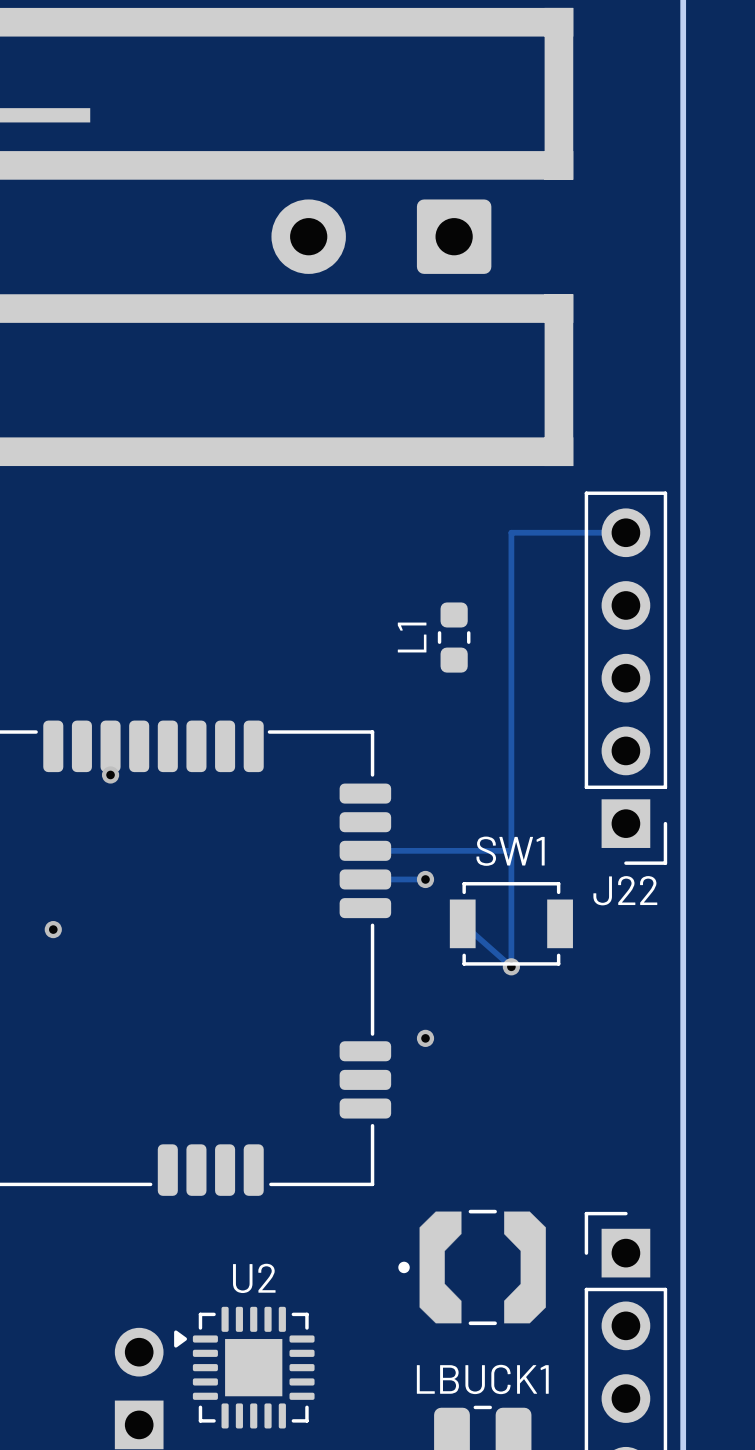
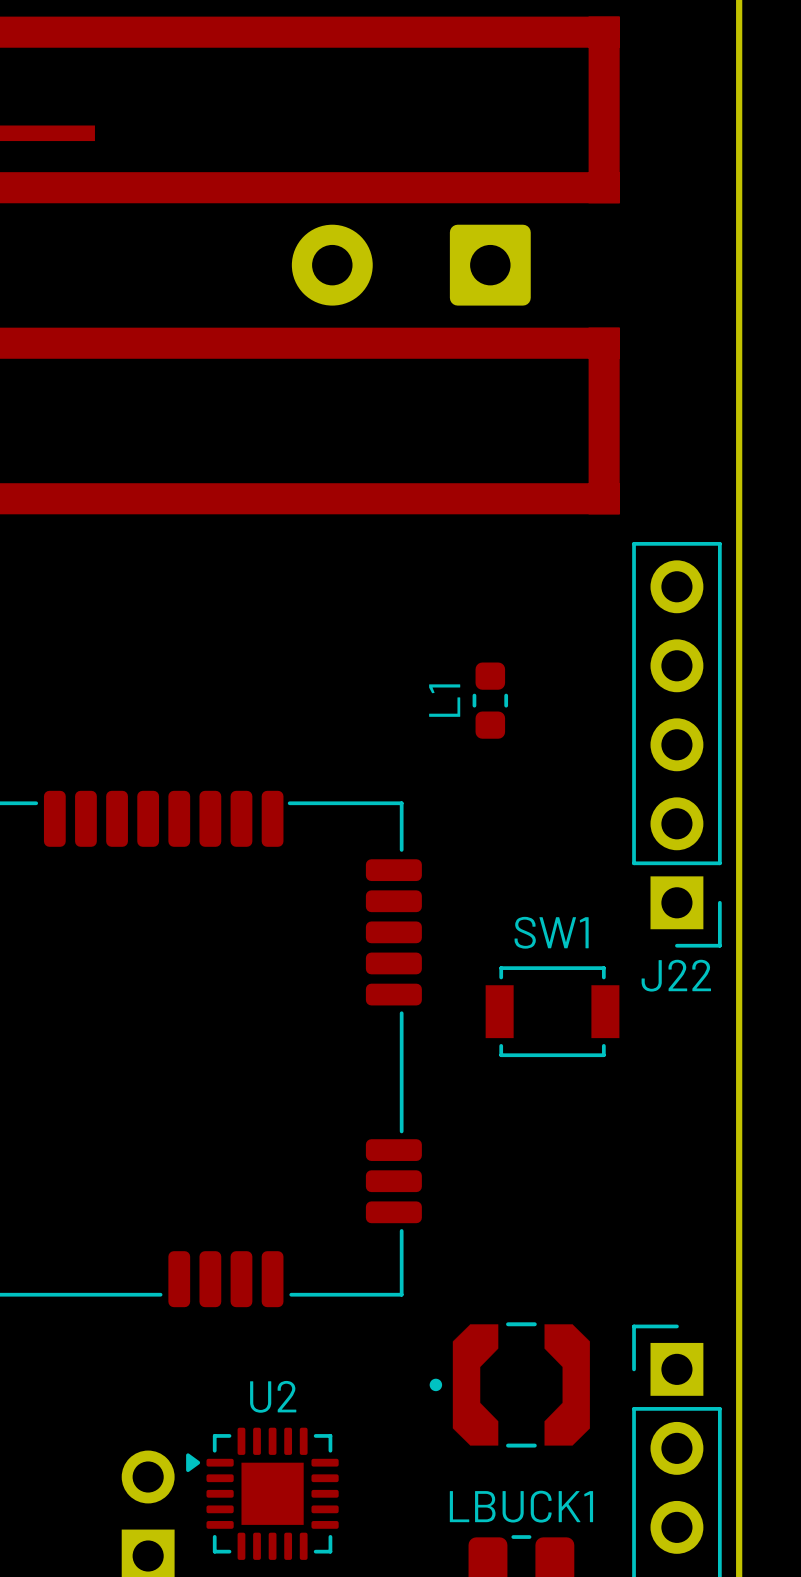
track: (625, 532) (511, 532) (511, 966) (462, 923) -> none
via: (110, 774) -> none
track: (365, 850) (511, 850) -> none
track: (365, 879) (425, 879) -> none
via: (425, 879) -> none
via: (53, 929) -> none
via: (511, 966) -> none
via: (425, 1038) -> none

